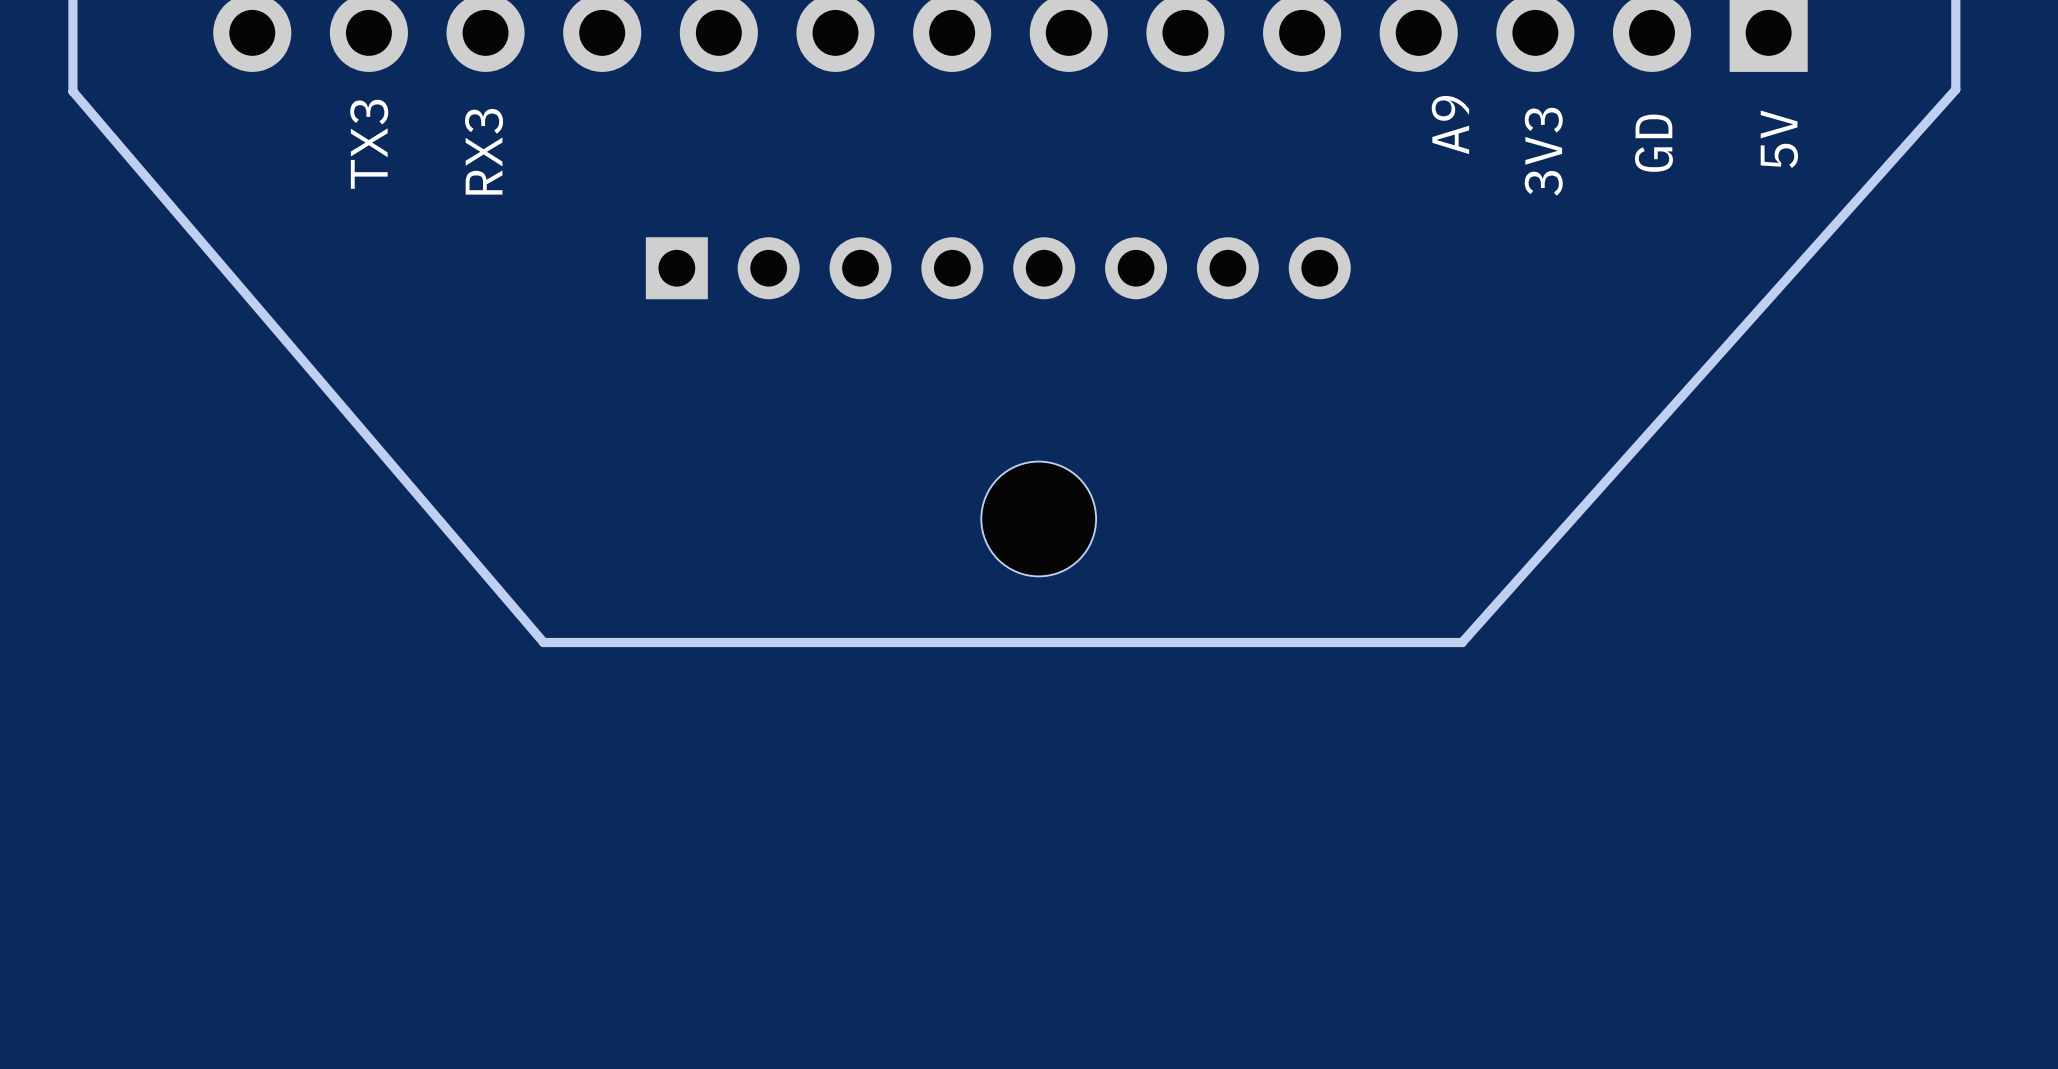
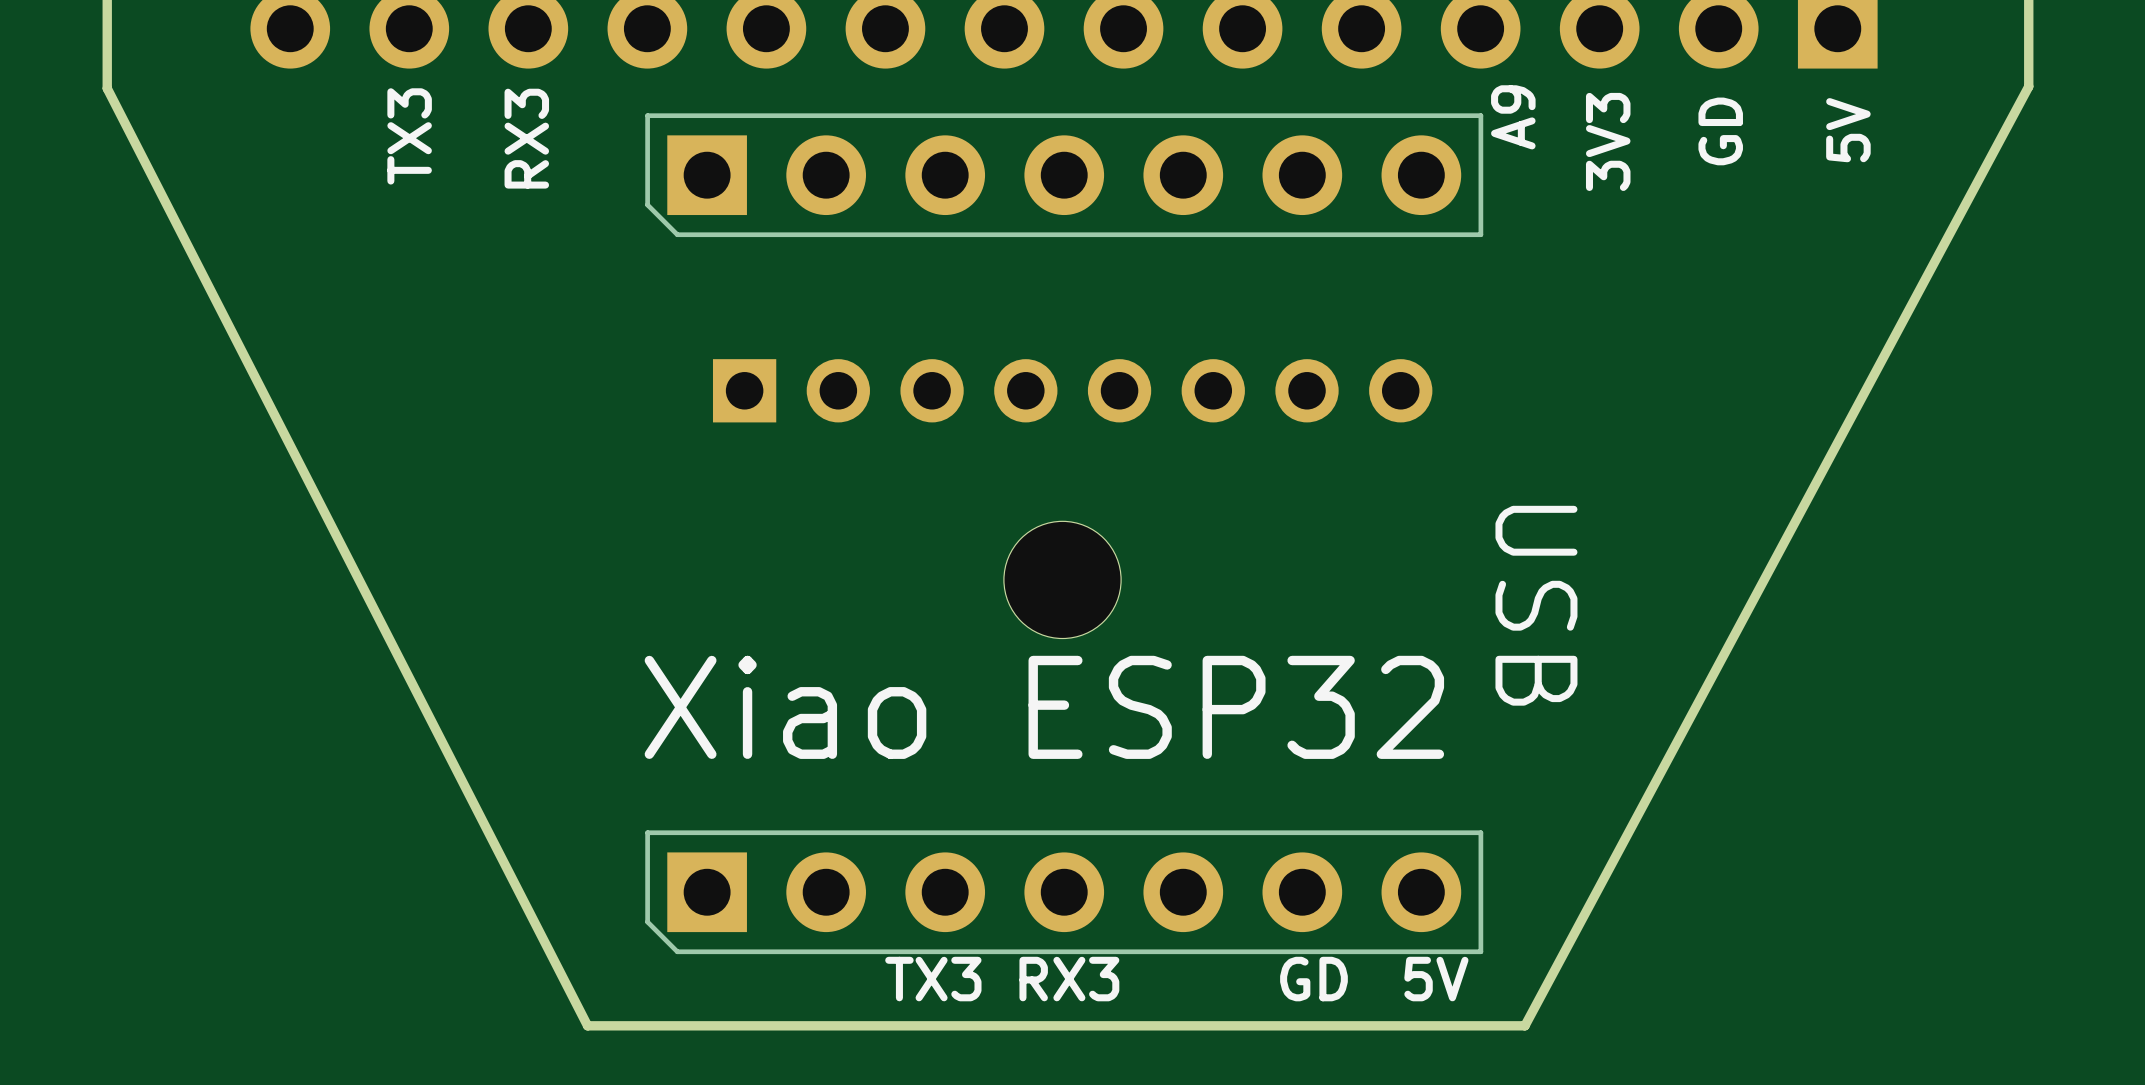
board edge: (1955, 89) (1462, 642) (543, 642) (72, 91) -> (2028, 86) (1524, 1025) (587, 1025) (107, 88)
part: none -> (1064, 175)
part position: (998, 268) -> (1072, 390)
part position: (1038, 518) -> (1062, 579)
text: none -> USB (1536, 605)
text: none -> Xiao ESP32 (1044, 707)
part: none -> (1064, 892)
text: none -> TX3 (933, 979)
text: none -> RX3 (1069, 979)
text: none -> GD (1313, 979)
text: none -> 5V (1436, 979)

